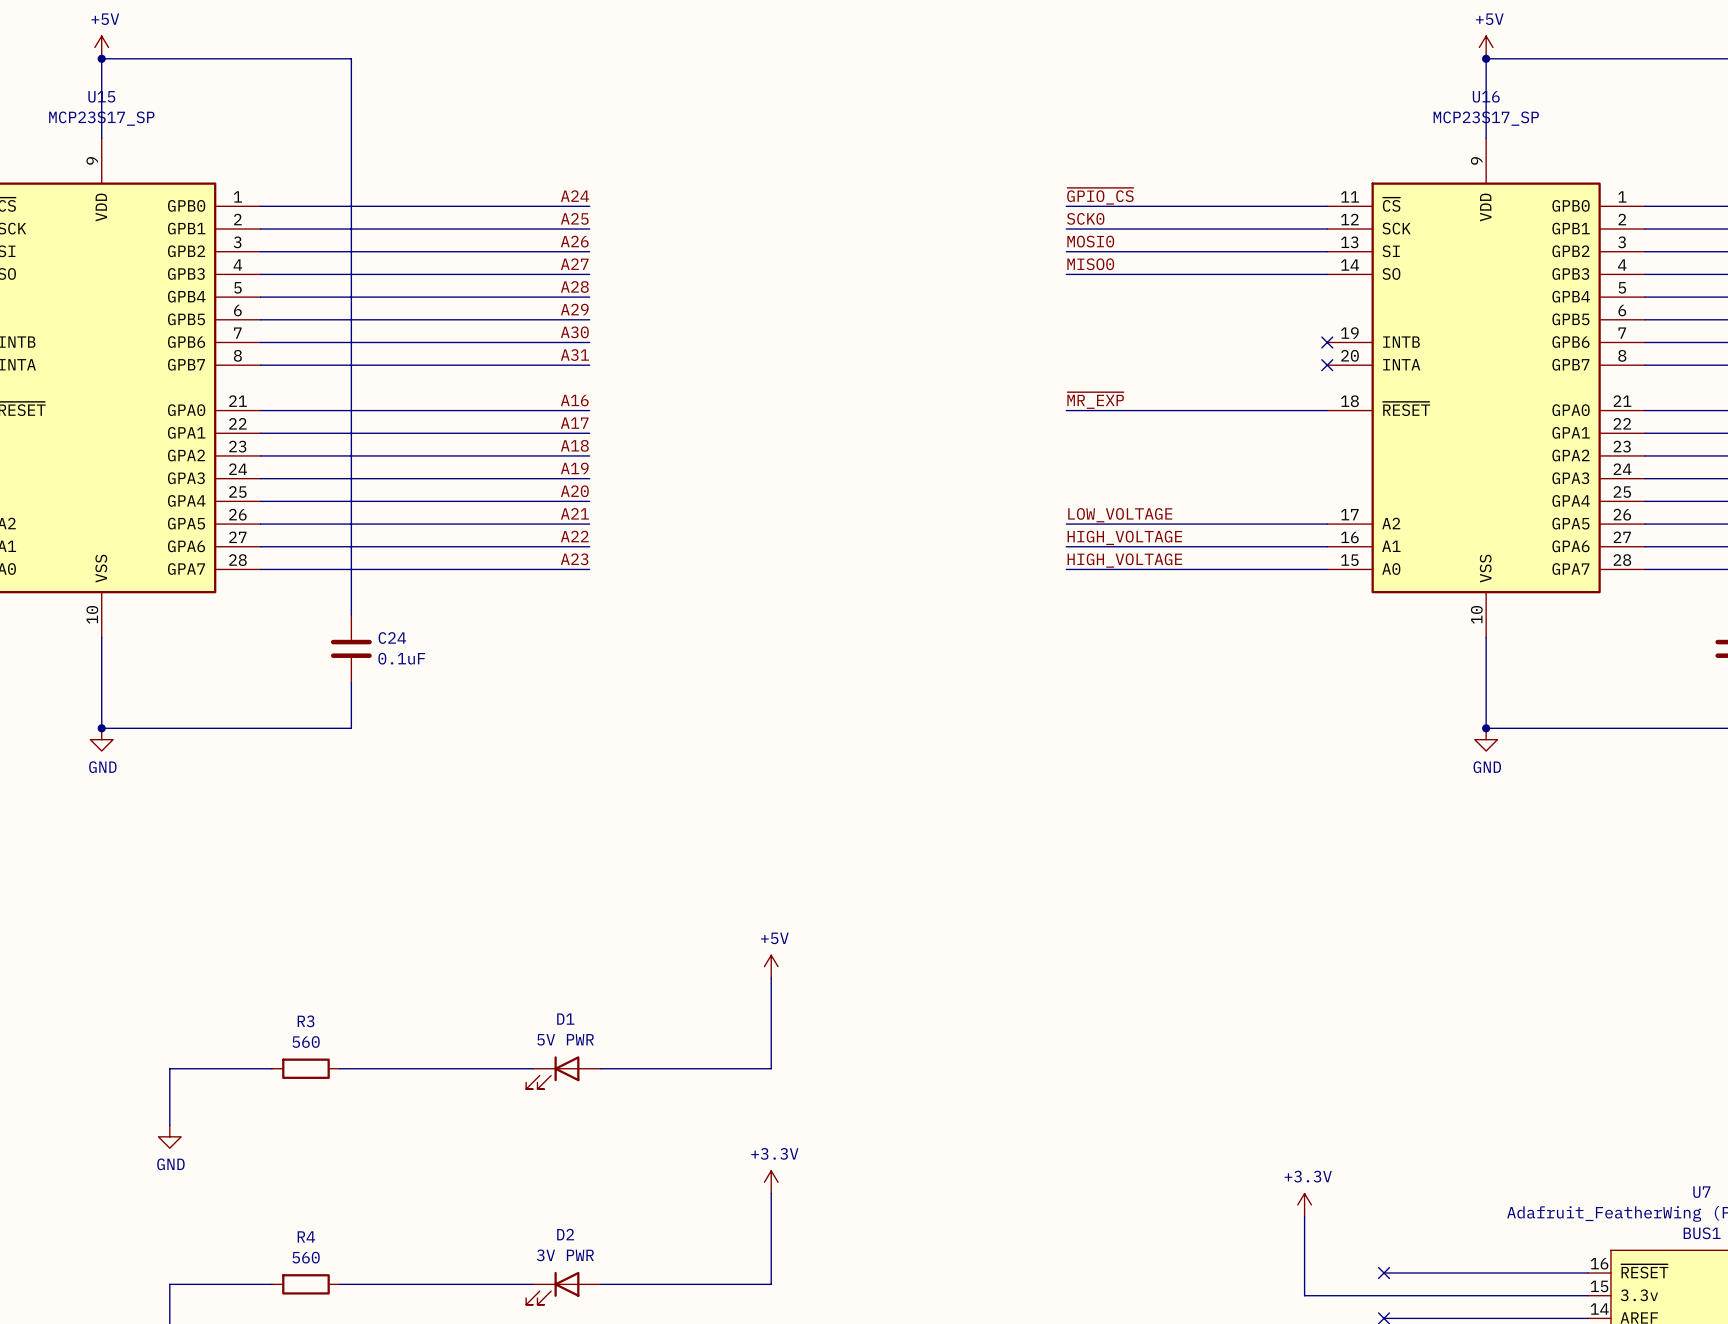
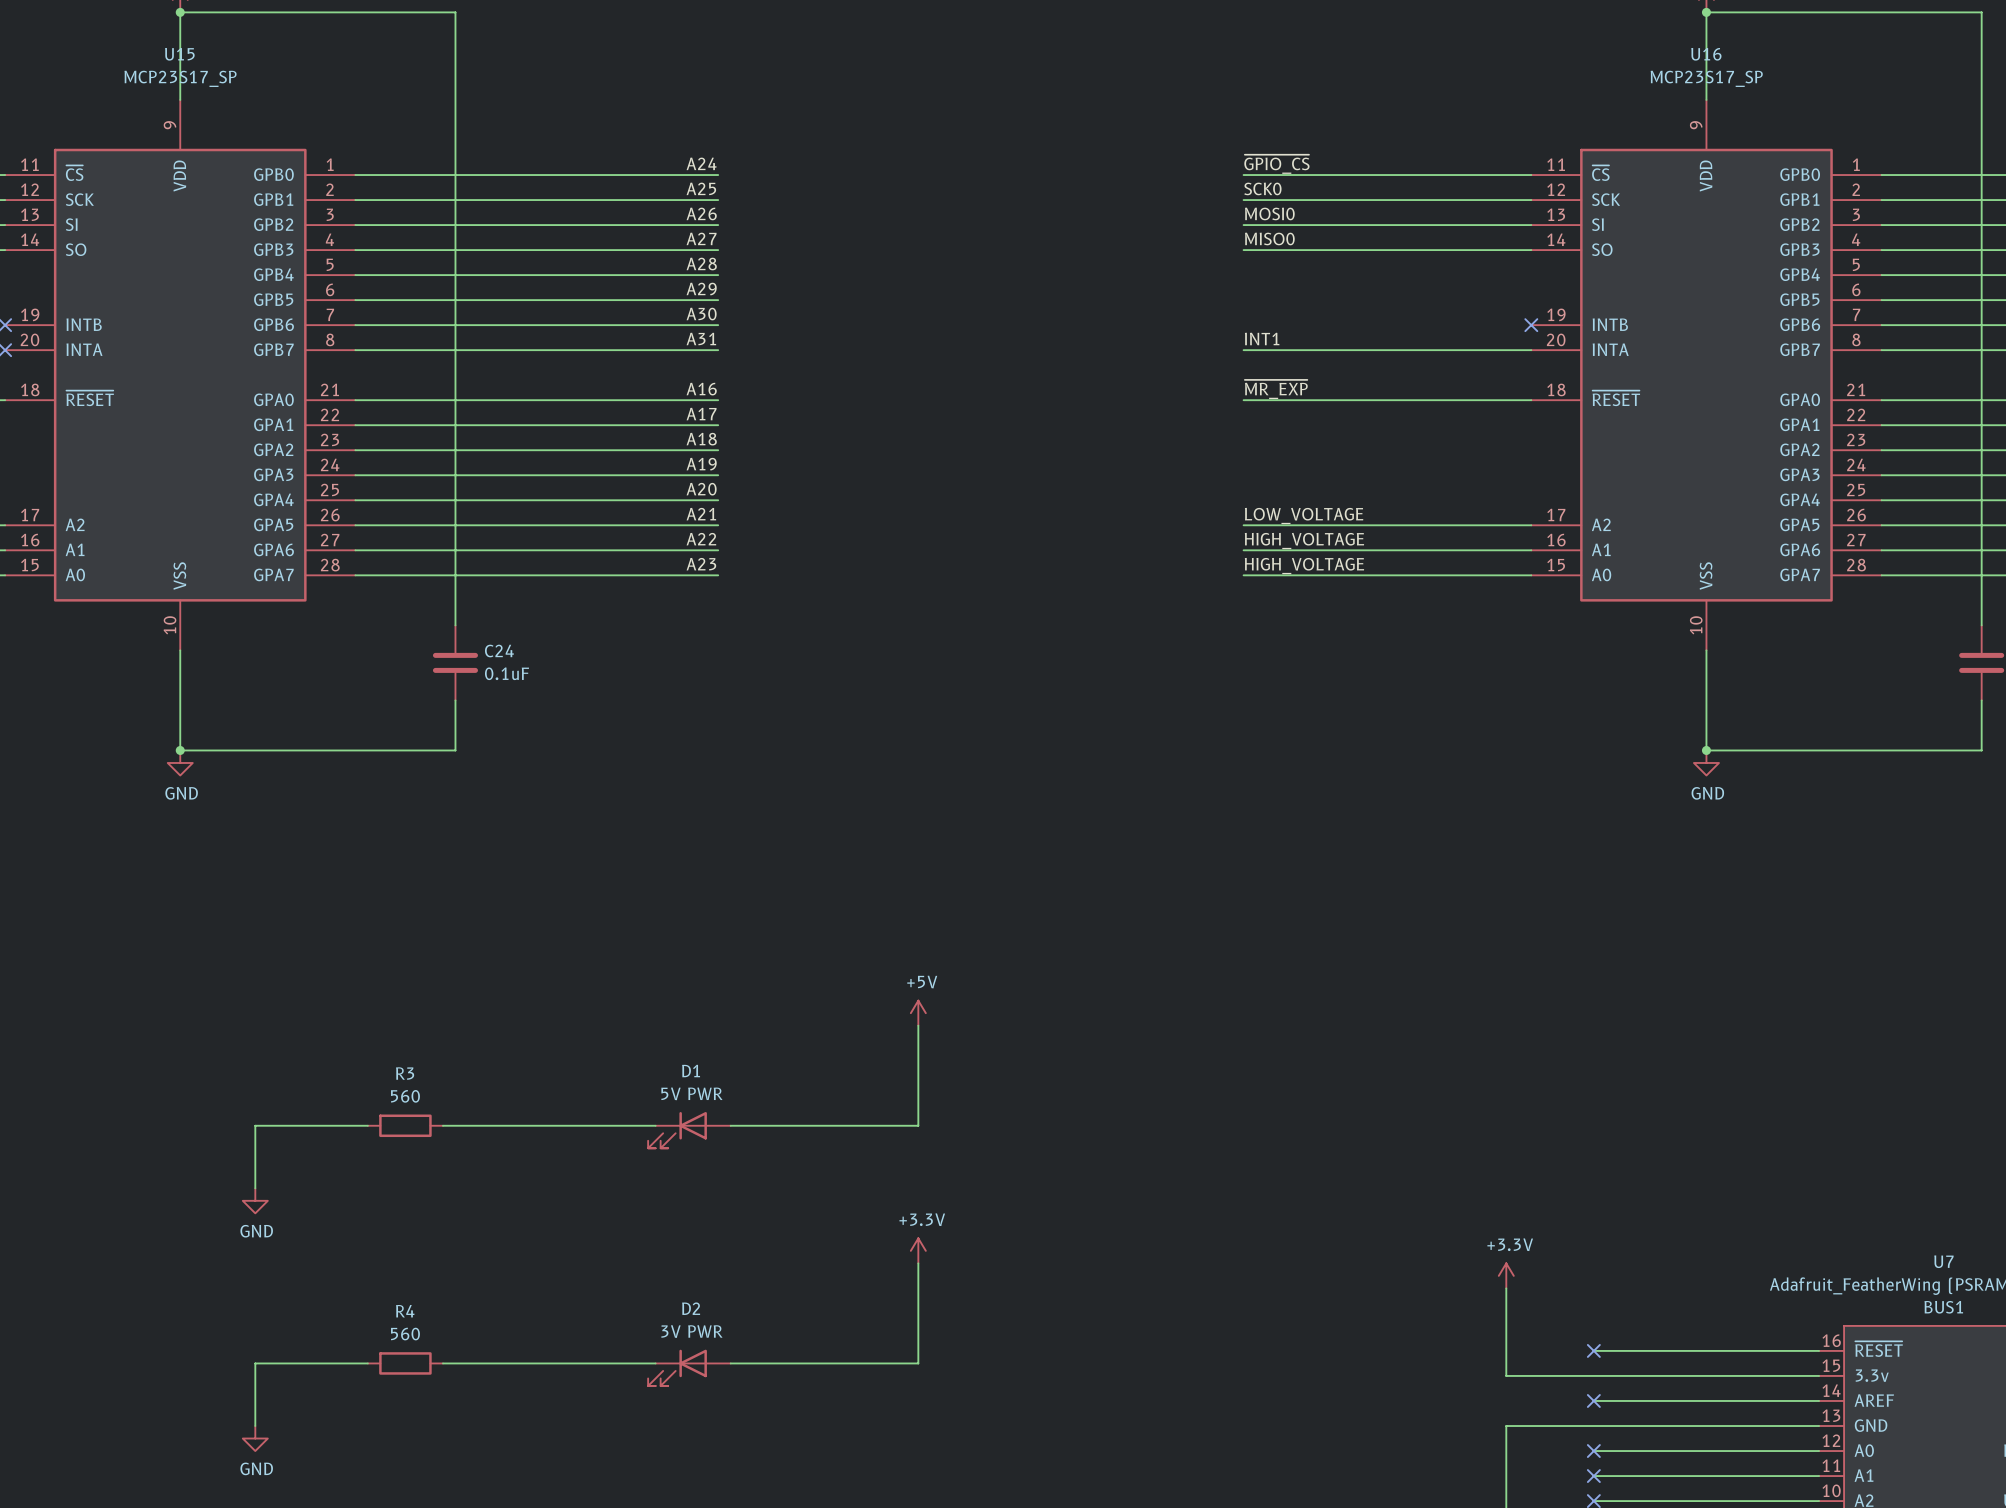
label: none -> INT1 (1262, 338)
wire: none -> (1243, 350) (1531, 350)
no-connect mark: (1327, 365) -> none

